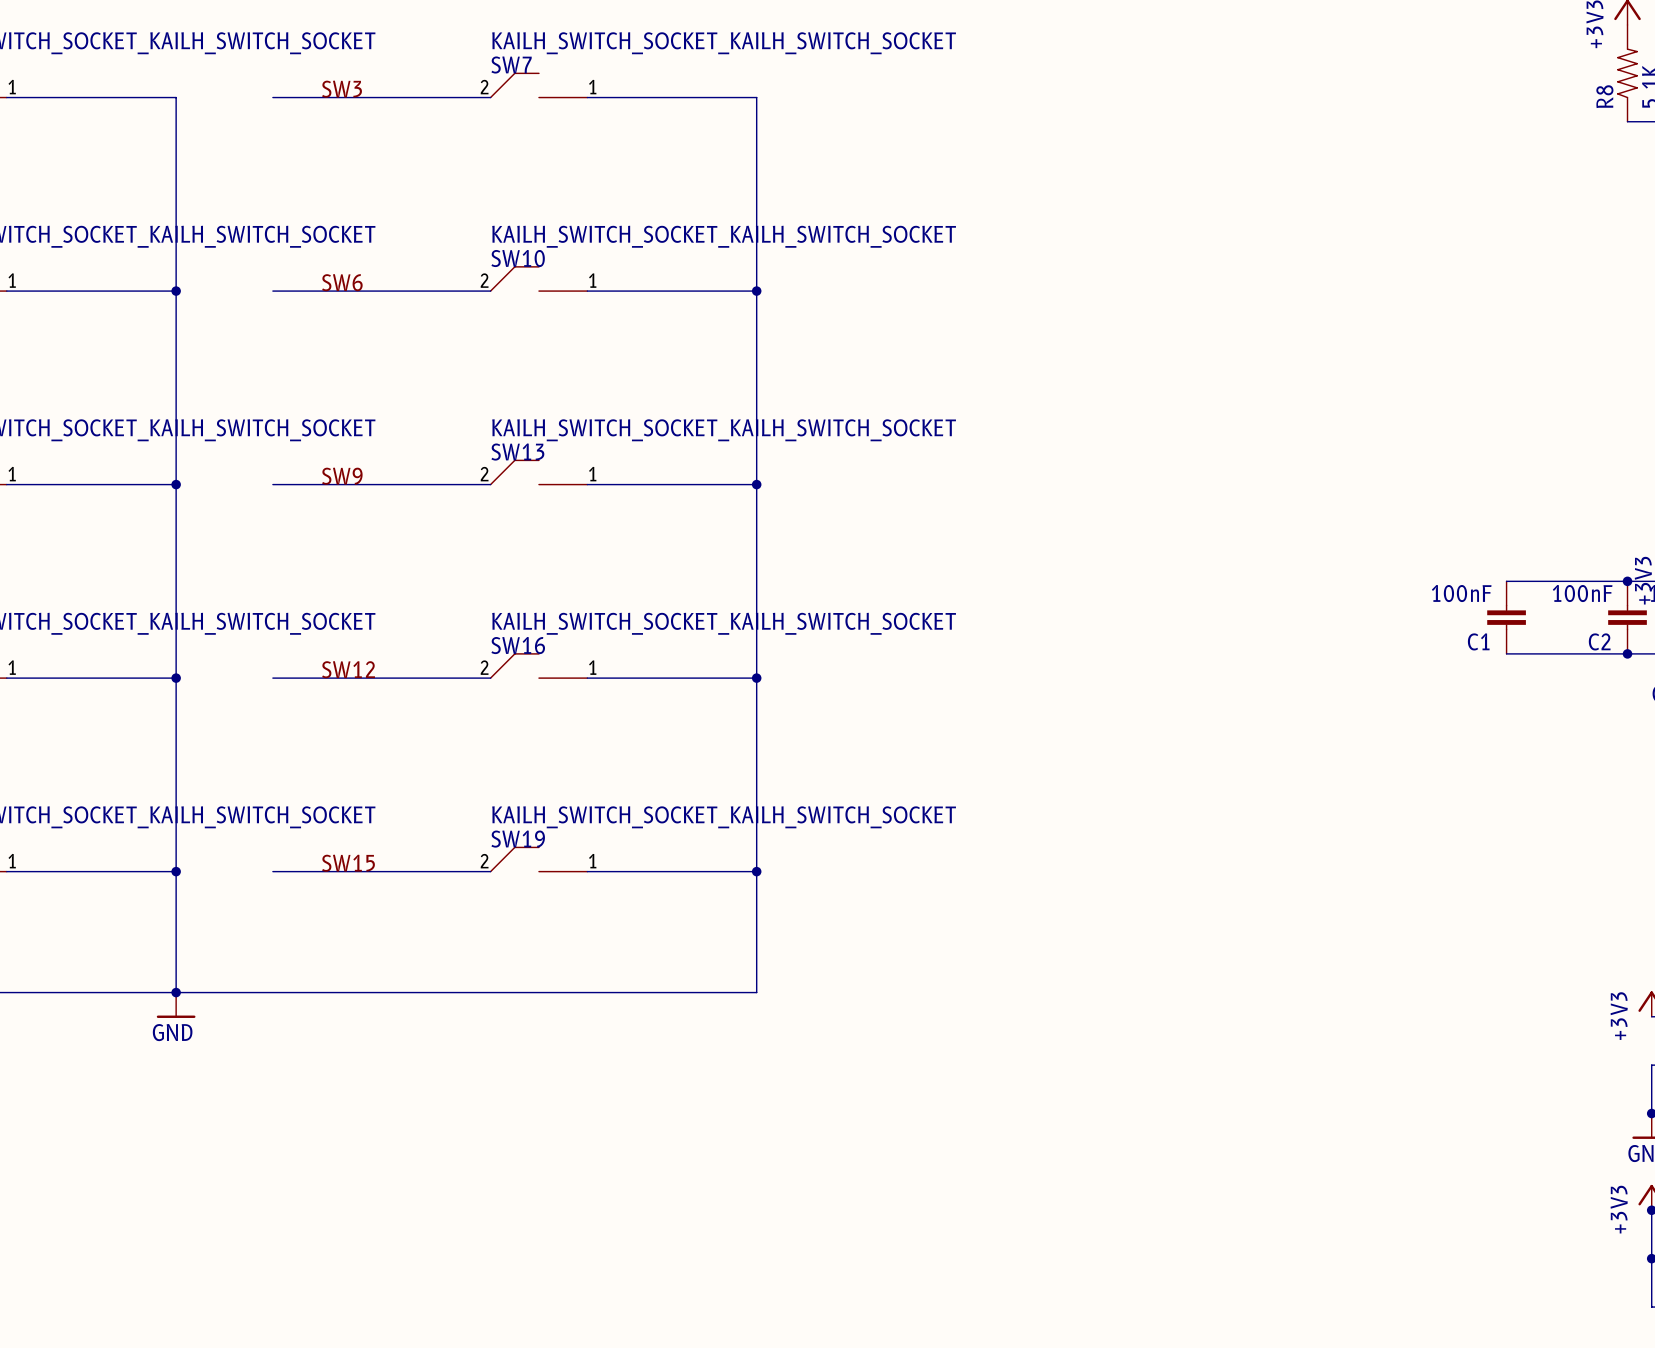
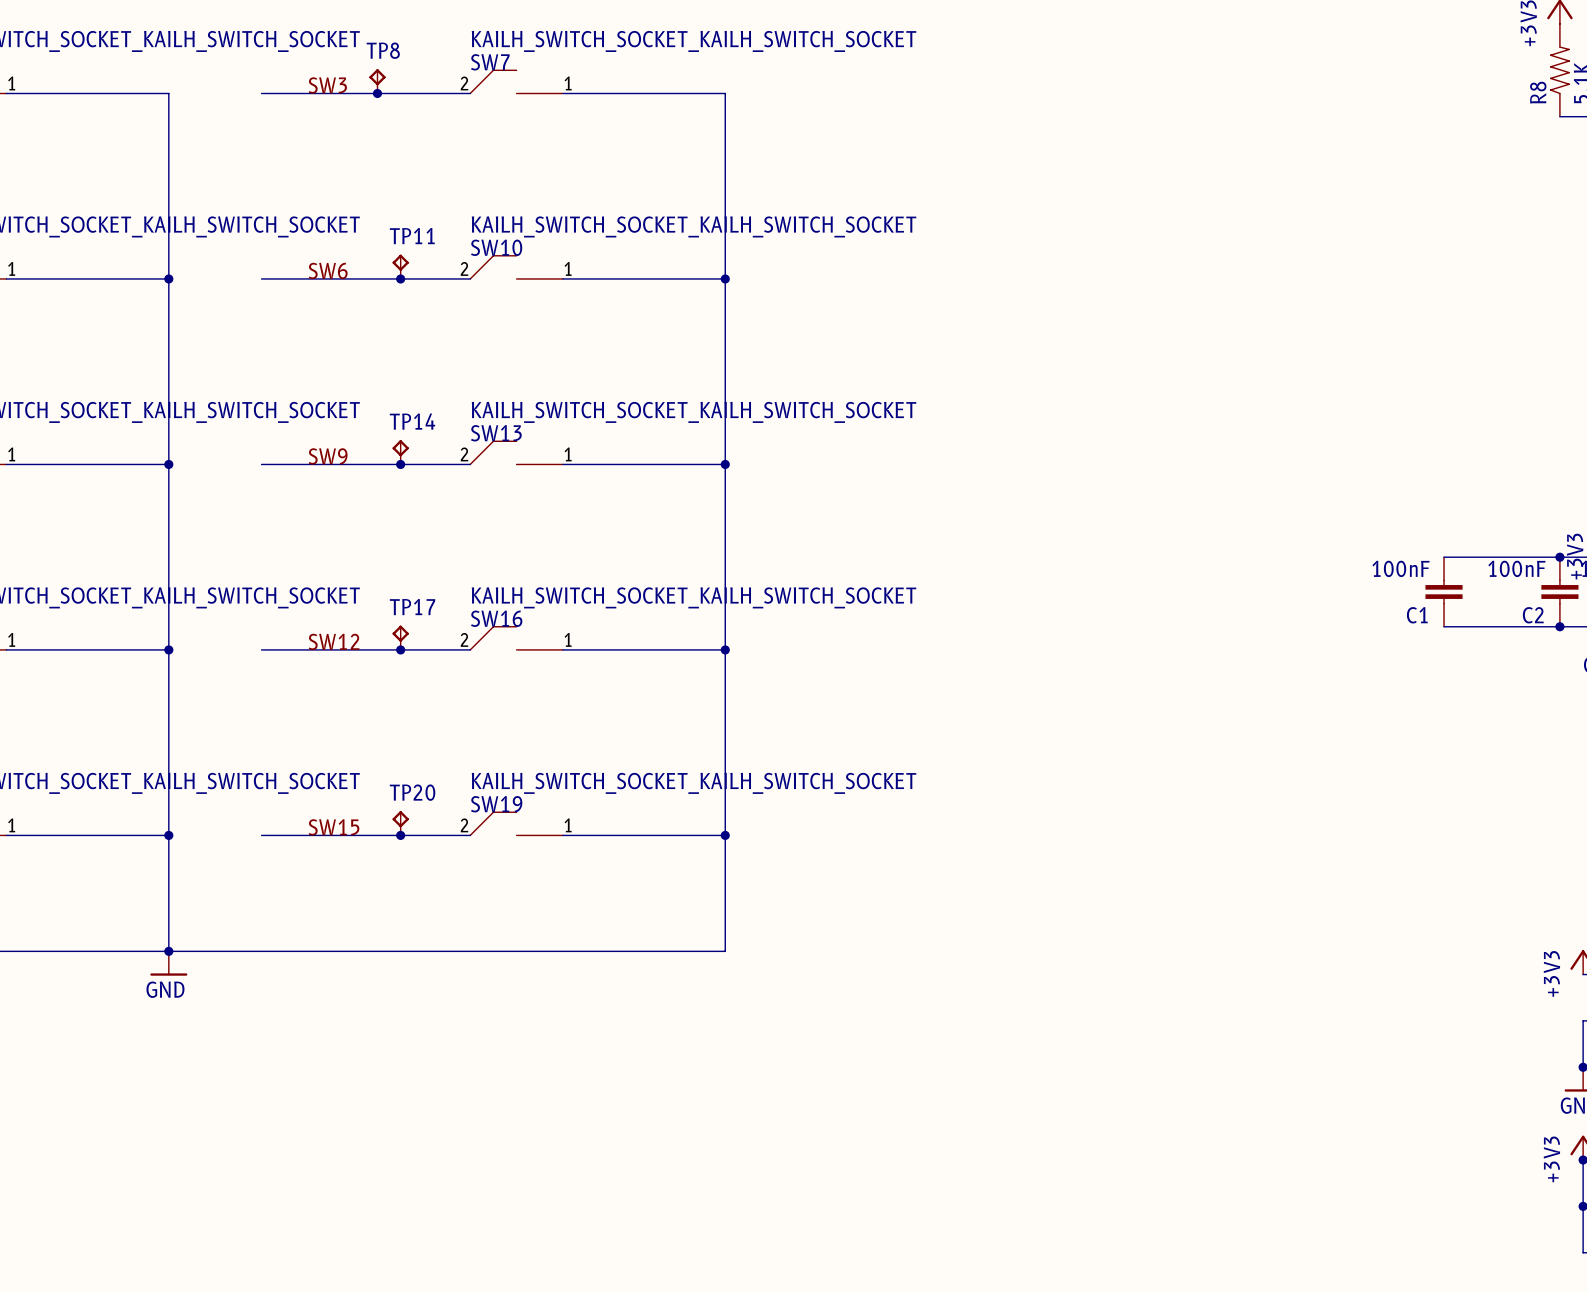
TP8: none -> (377, 81)
junction: none -> (377, 93)
TP11: none -> (400, 266)
junction: none -> (400, 278)
TP14: none -> (400, 452)
junction: none -> (400, 464)
TP17: none -> (400, 637)
junction: none -> (400, 649)
TP20: none -> (400, 823)
junction: none -> (400, 835)

